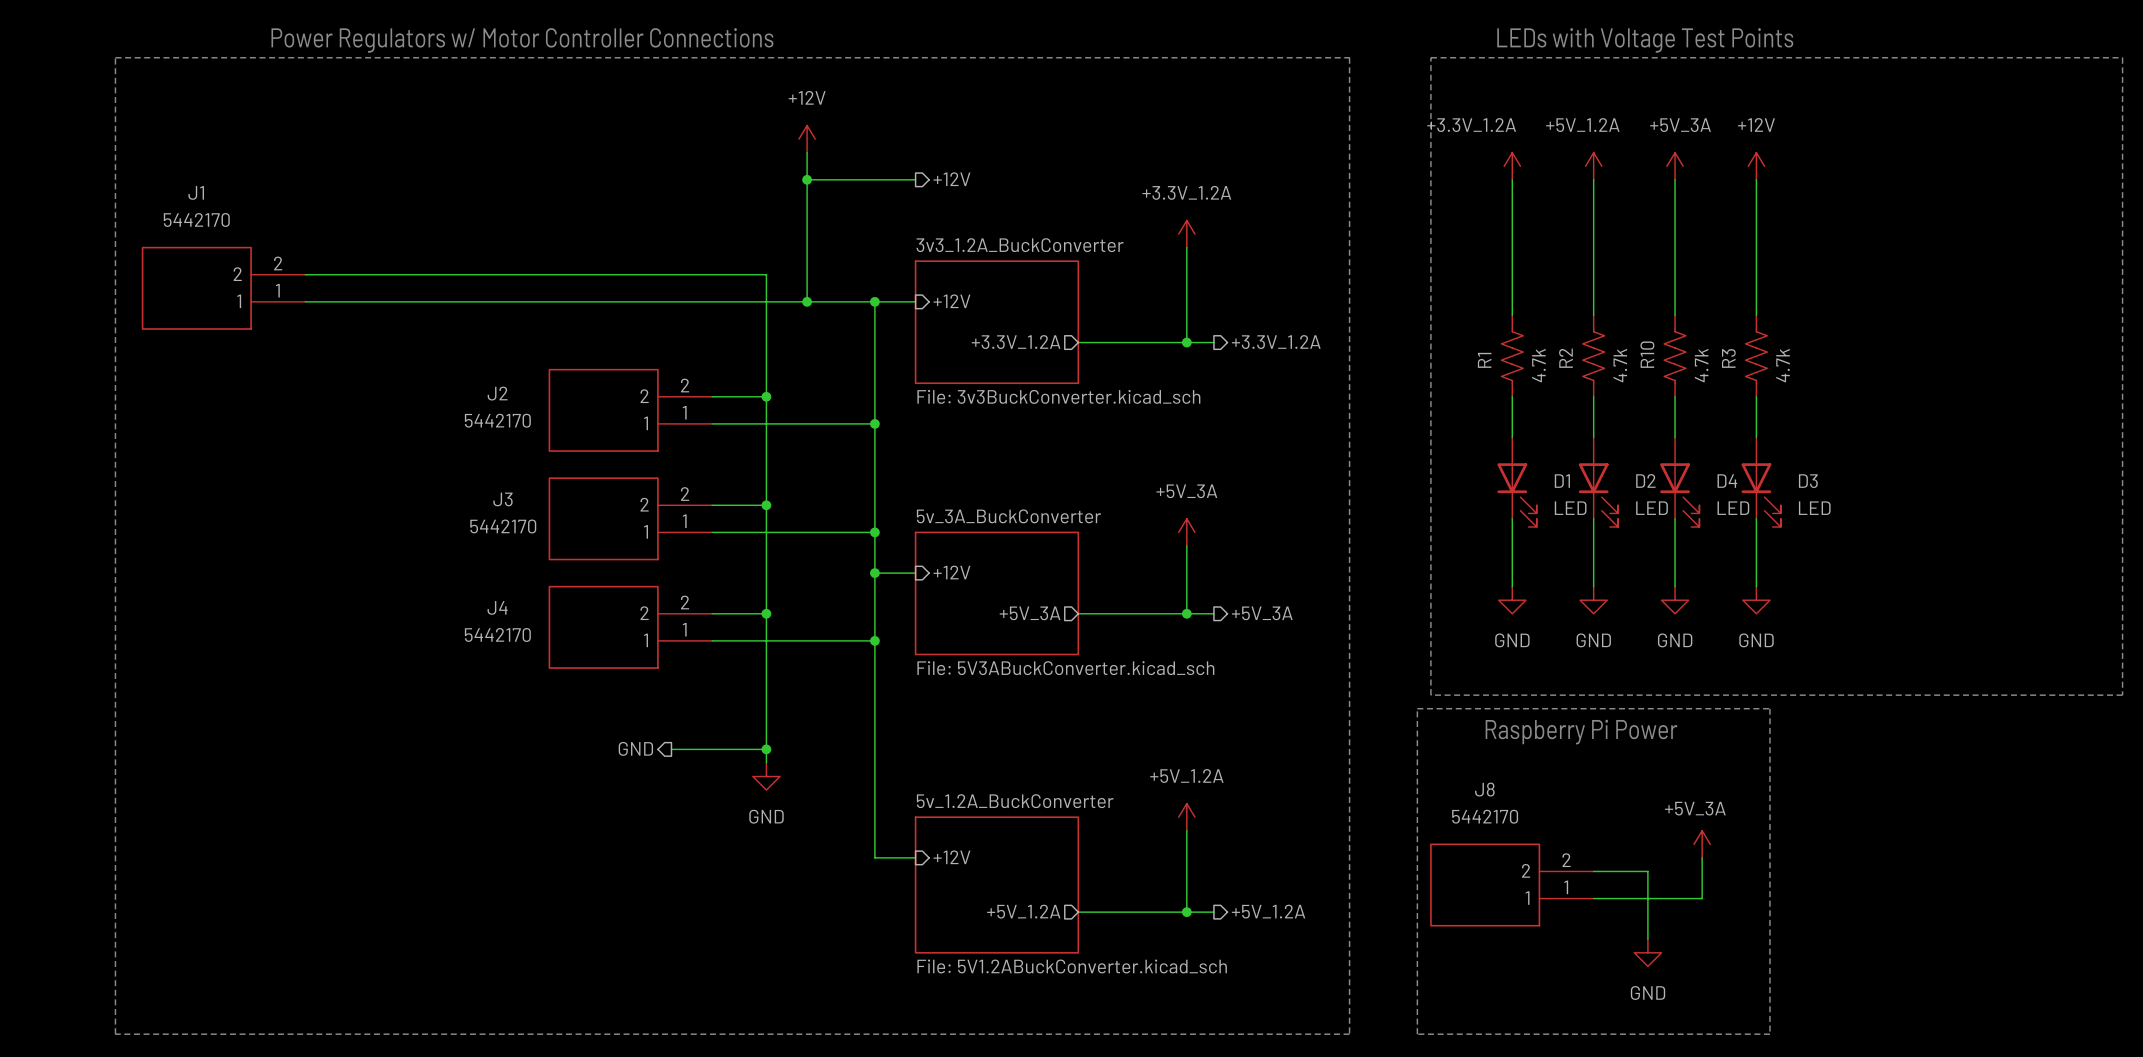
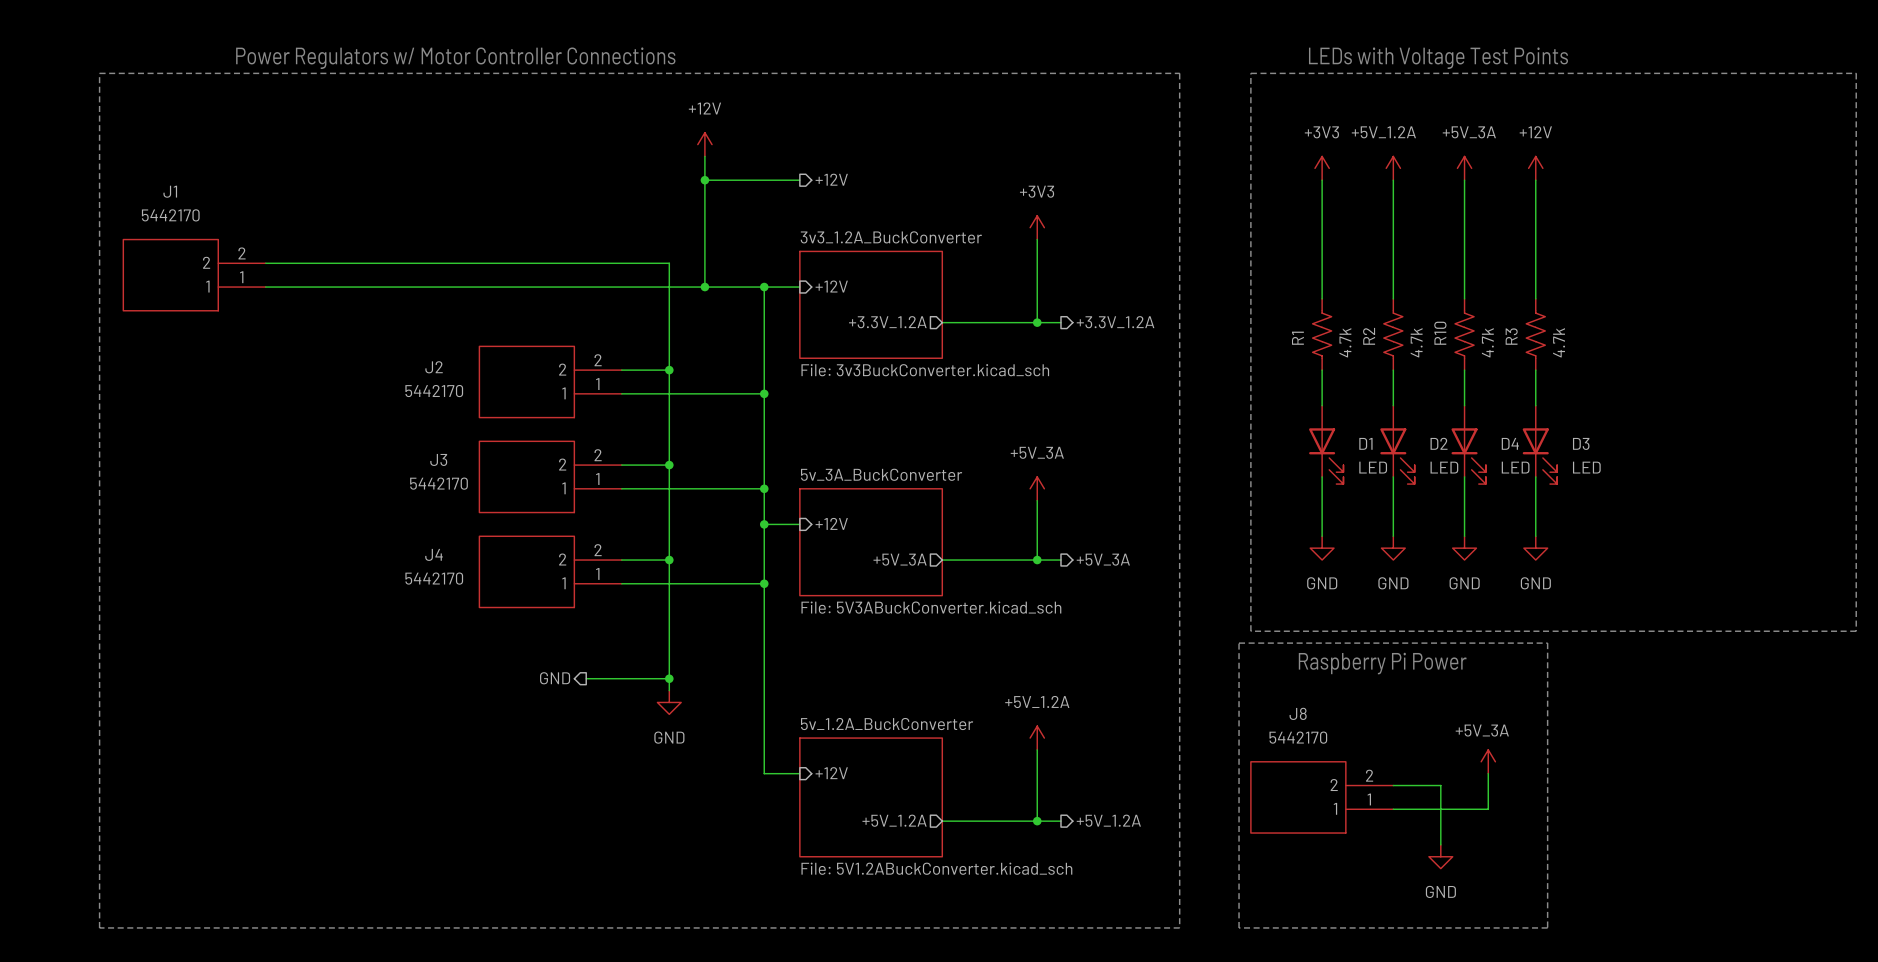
power symbol: +3.3V_1.2A (1512, 166) -> +3V3 (1322, 168)
power symbol: +3.3V_1.2A (1186, 234) -> +3V3 (1037, 227)

